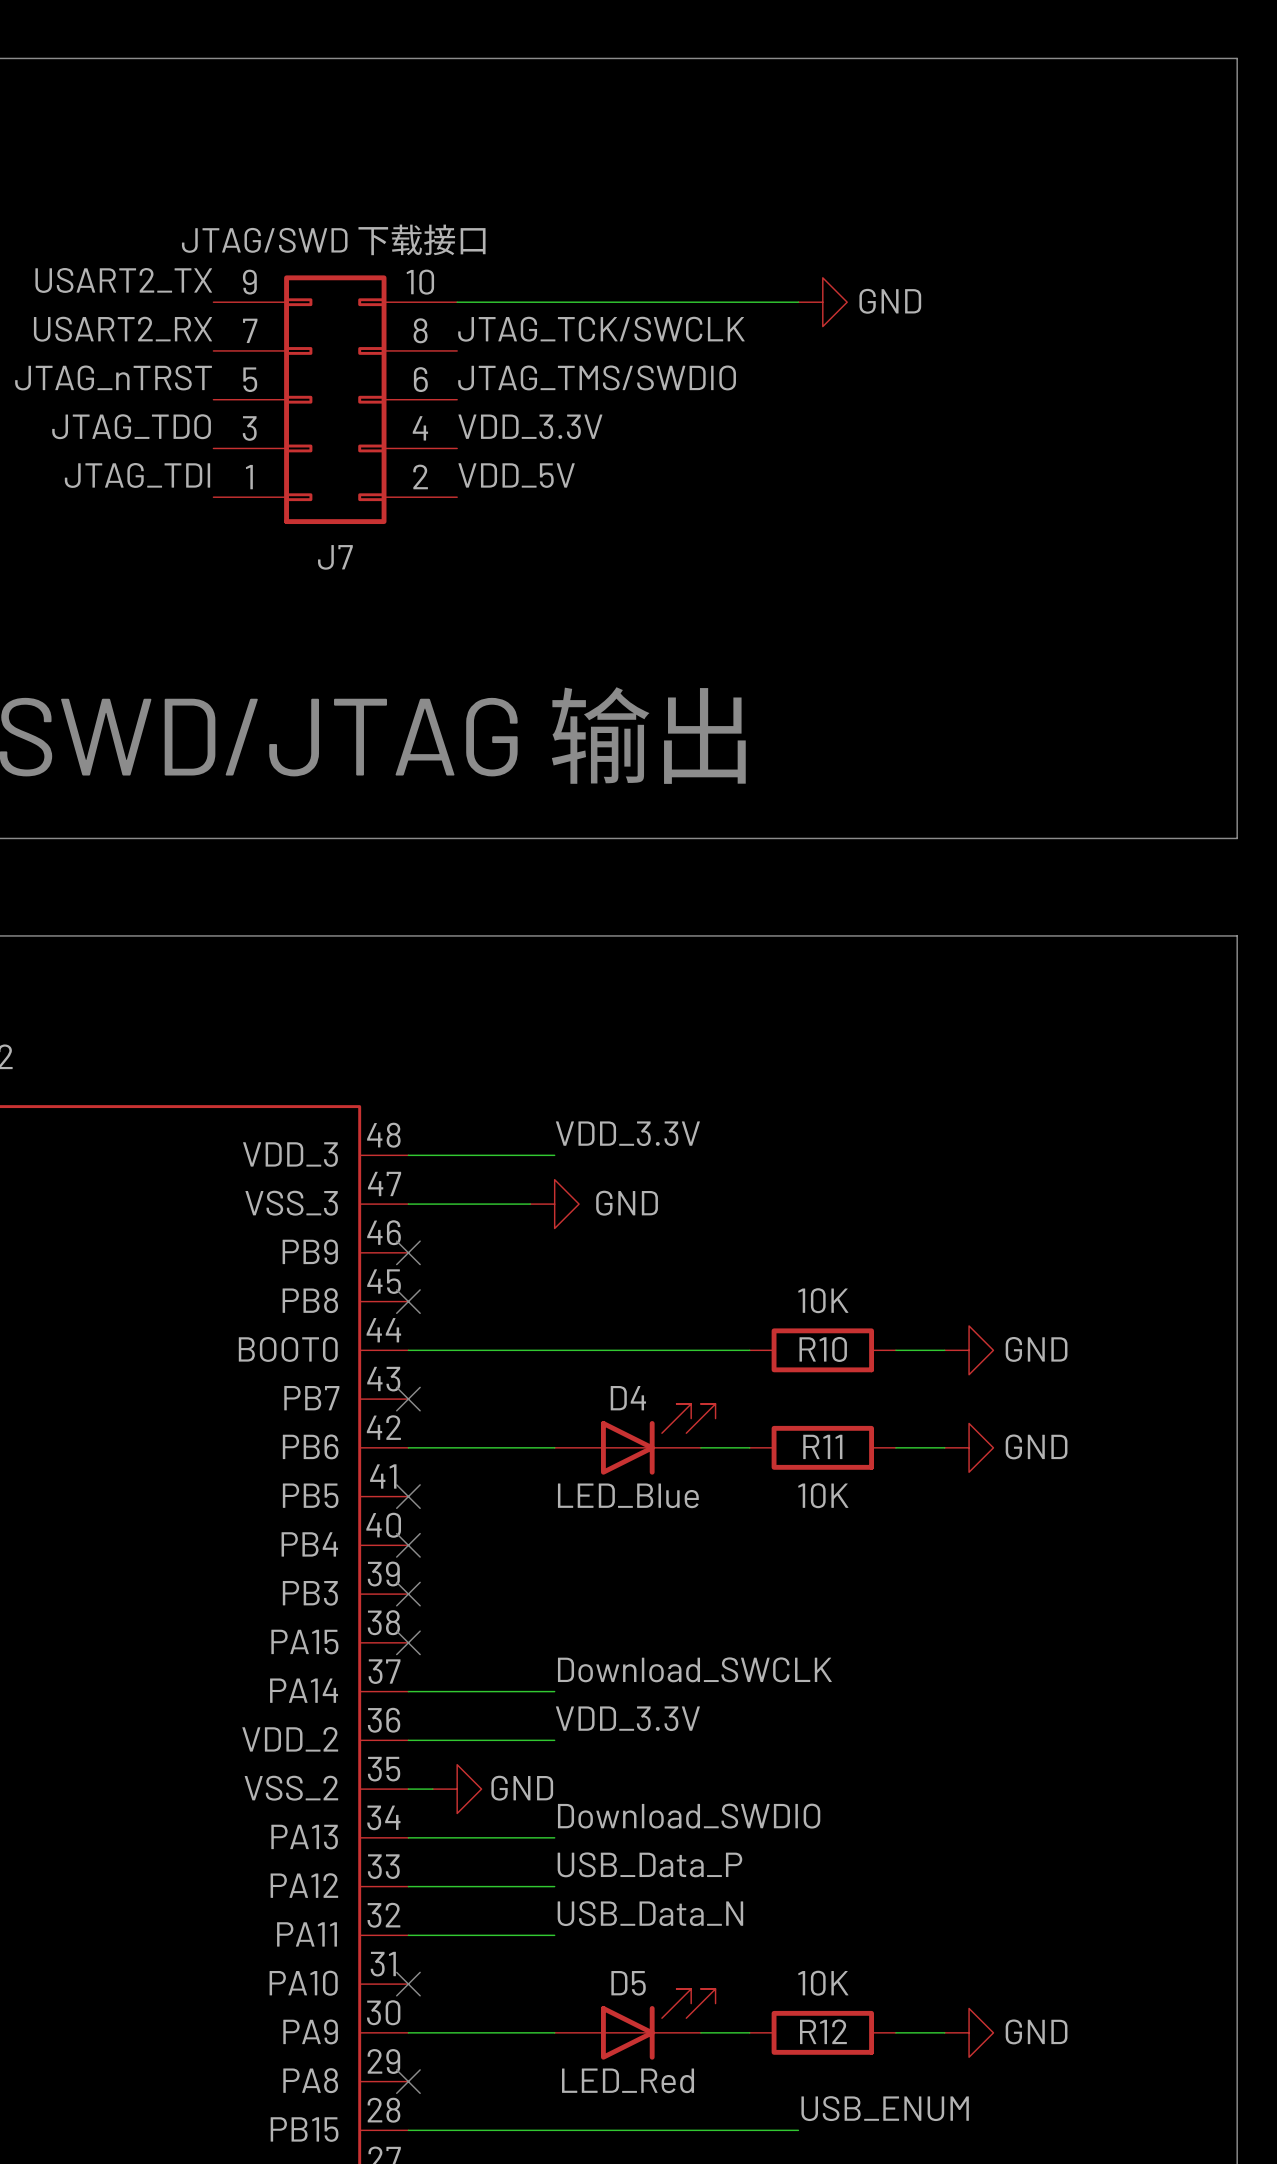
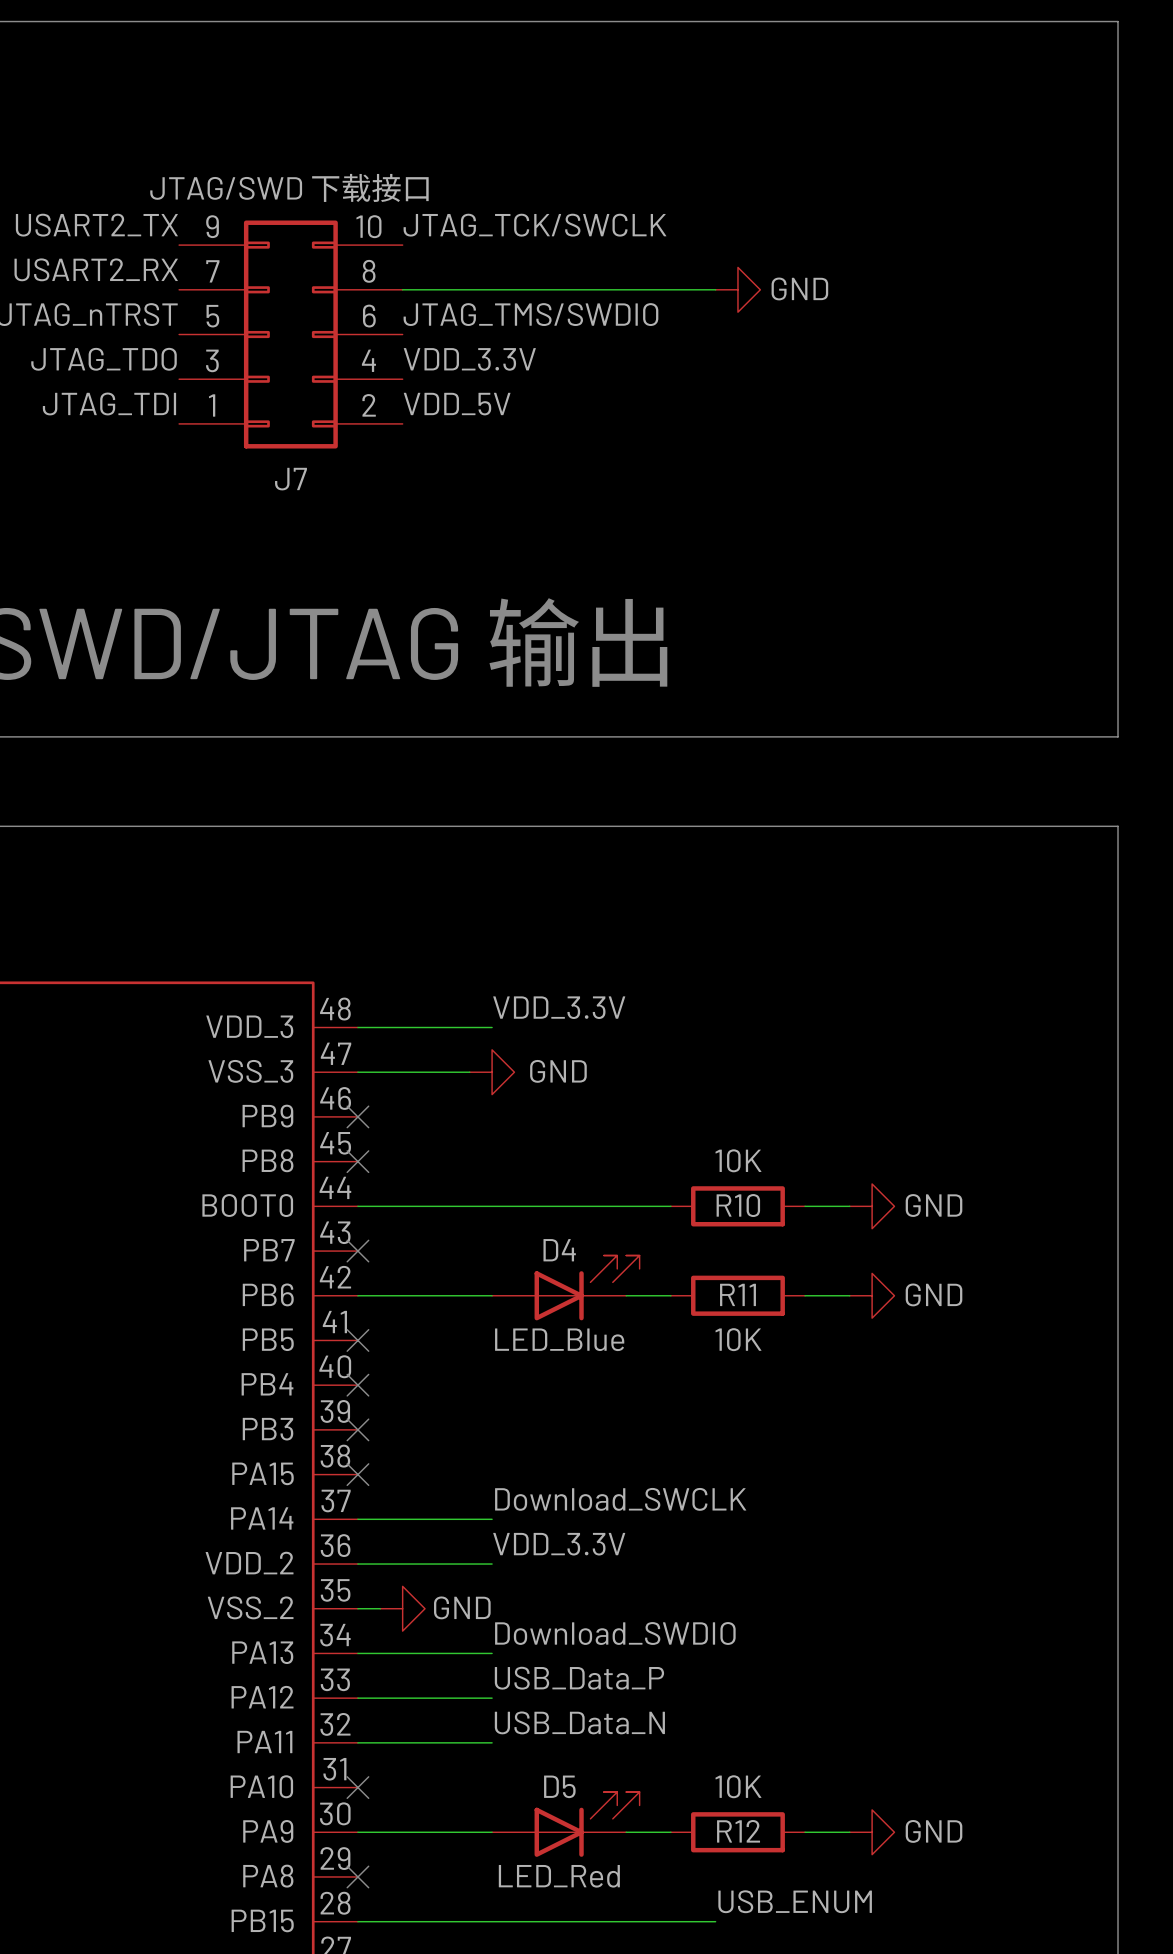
wire: (457, 302) (798, 302) -> (402, 289) (715, 289)
power symbol position: GND (822, 302) -> GND (737, 289)
label position: JTAG_TCK/SWCLK (601, 329) -> JTAG_TCK/SWCLK (534, 225)

